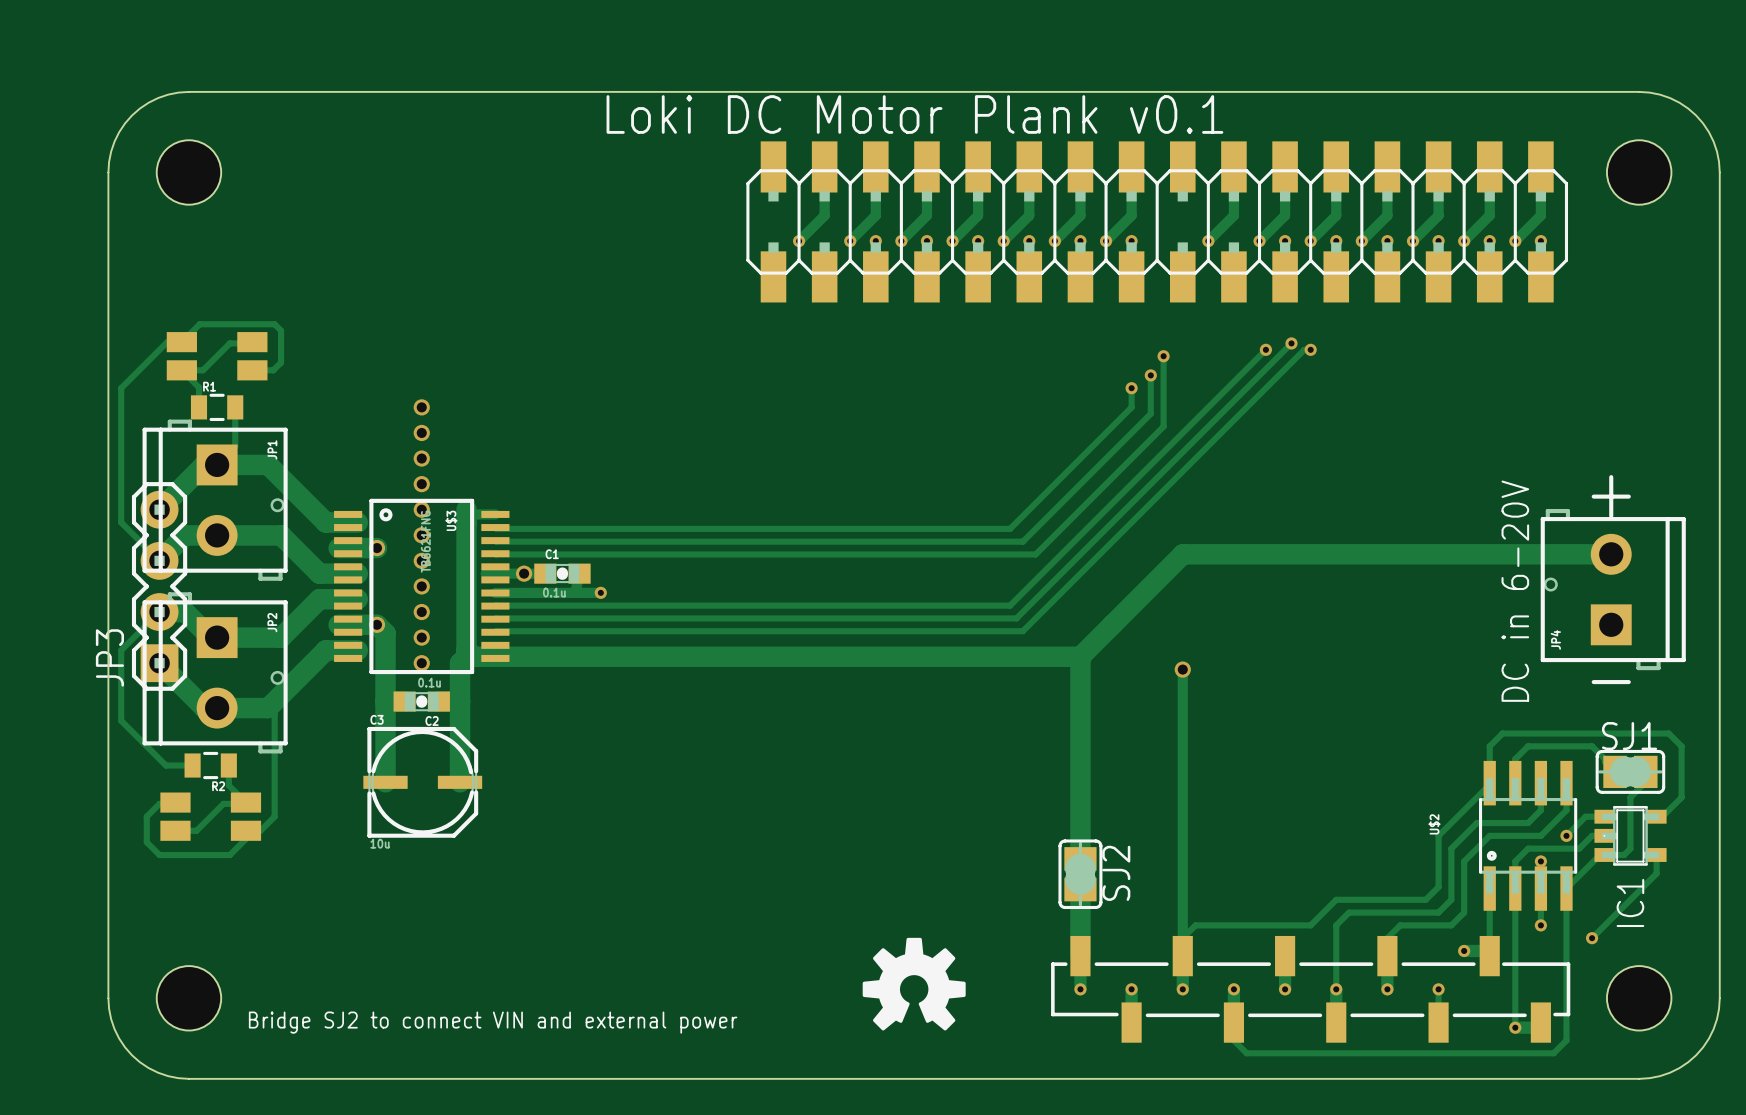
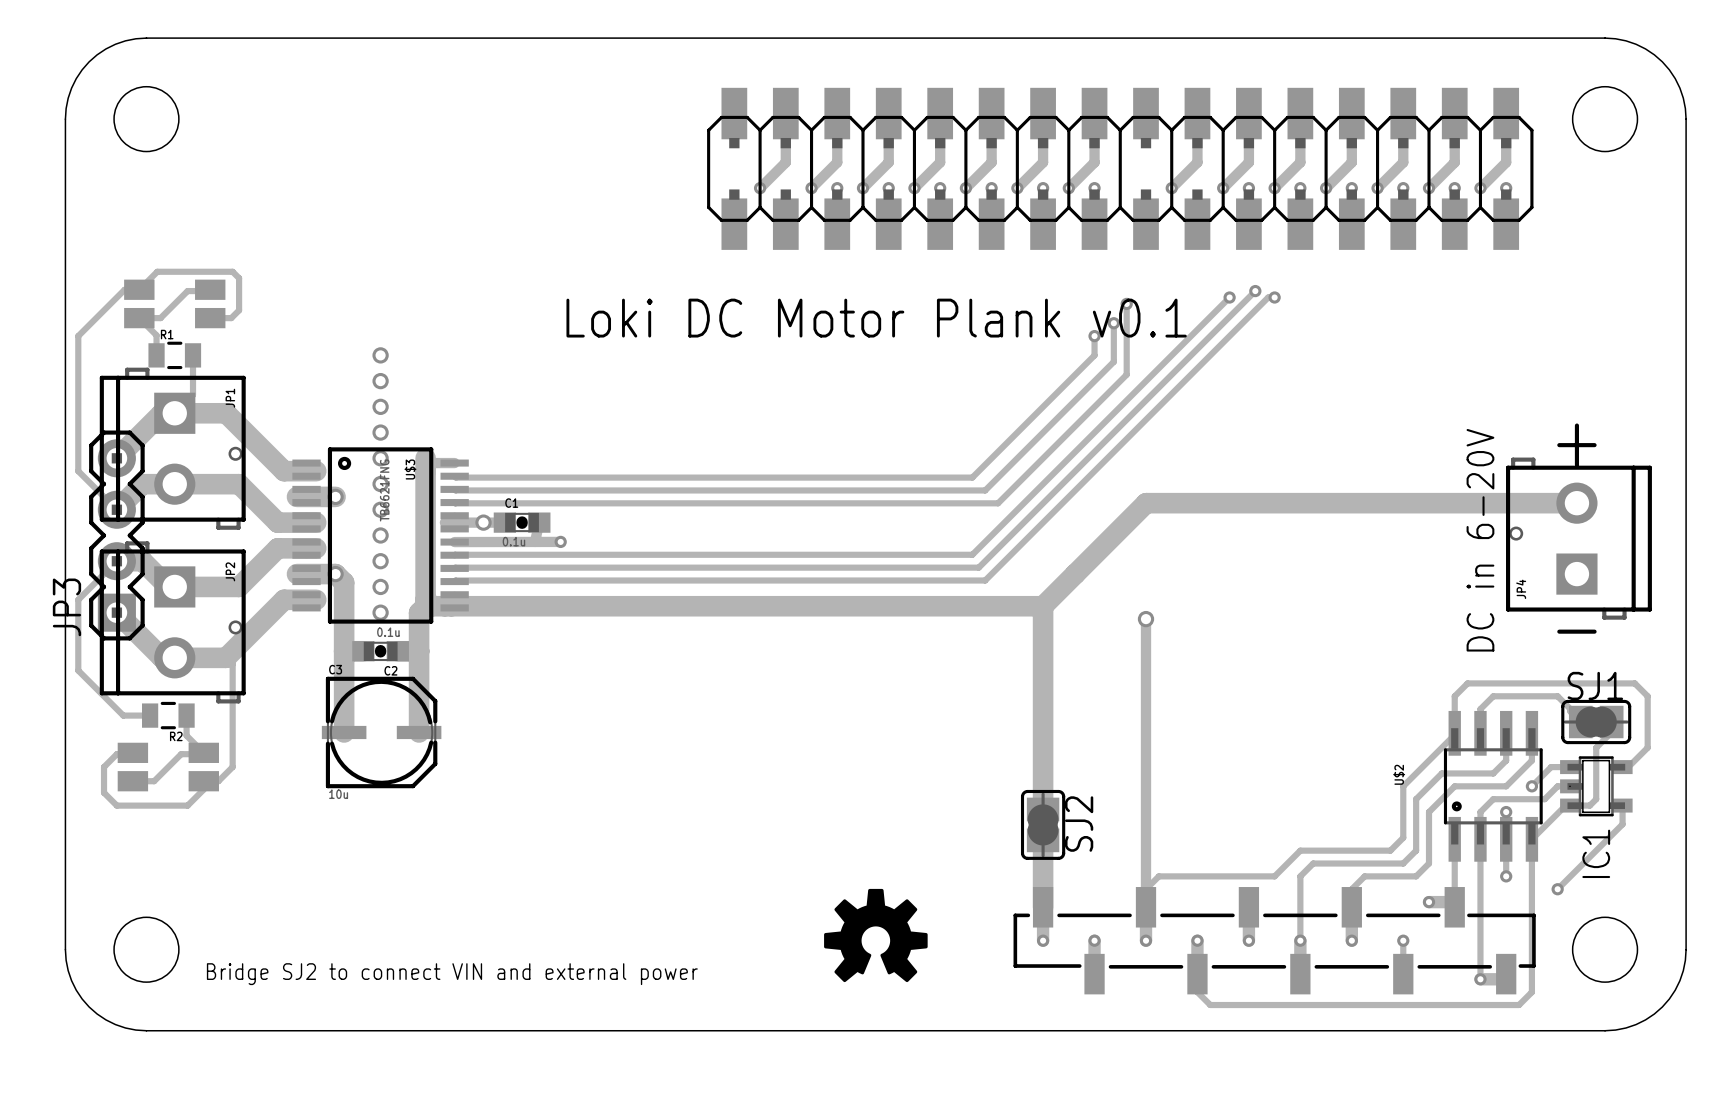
text position: Loki DC Motor Plank v0.1 (914, 114) -> Loki DC Motor Plank v0.1 (876, 318)

